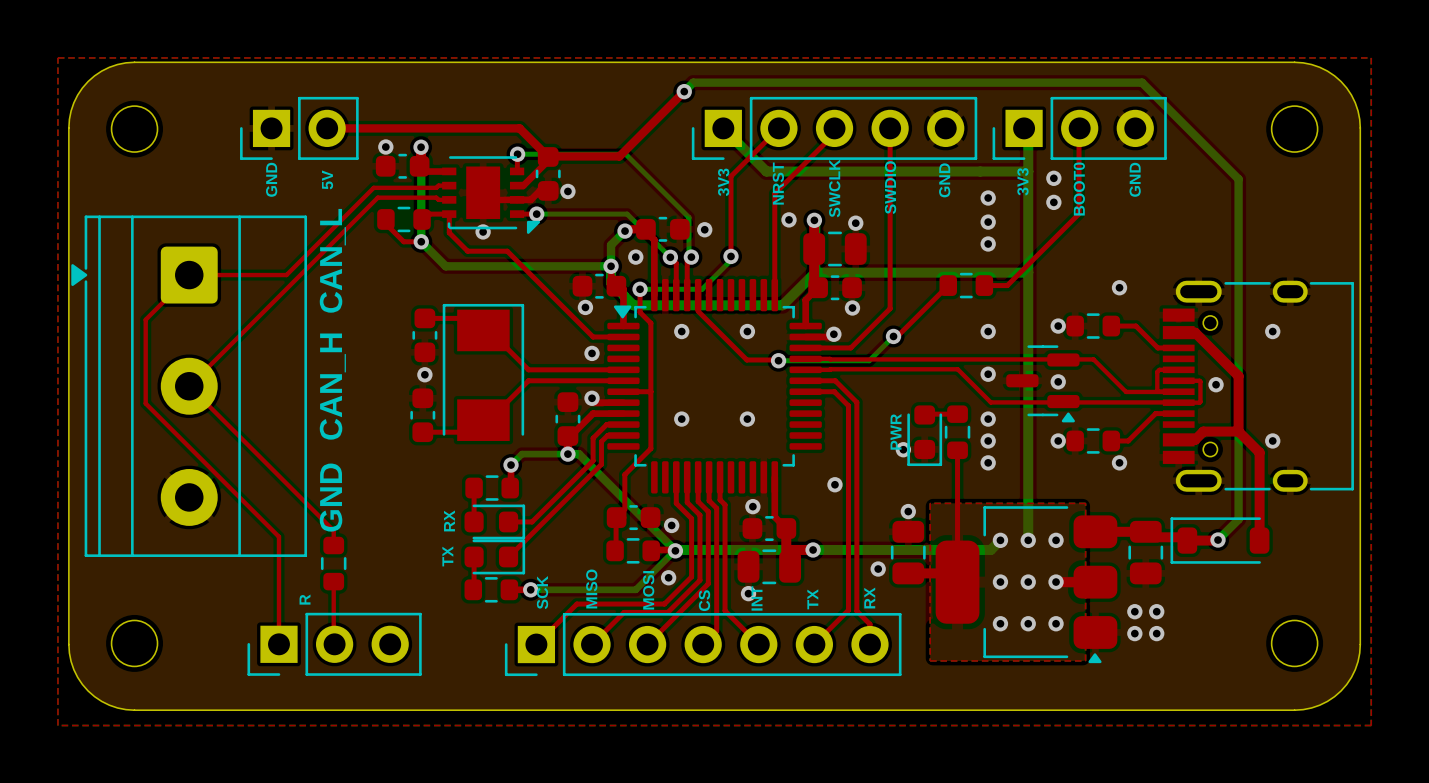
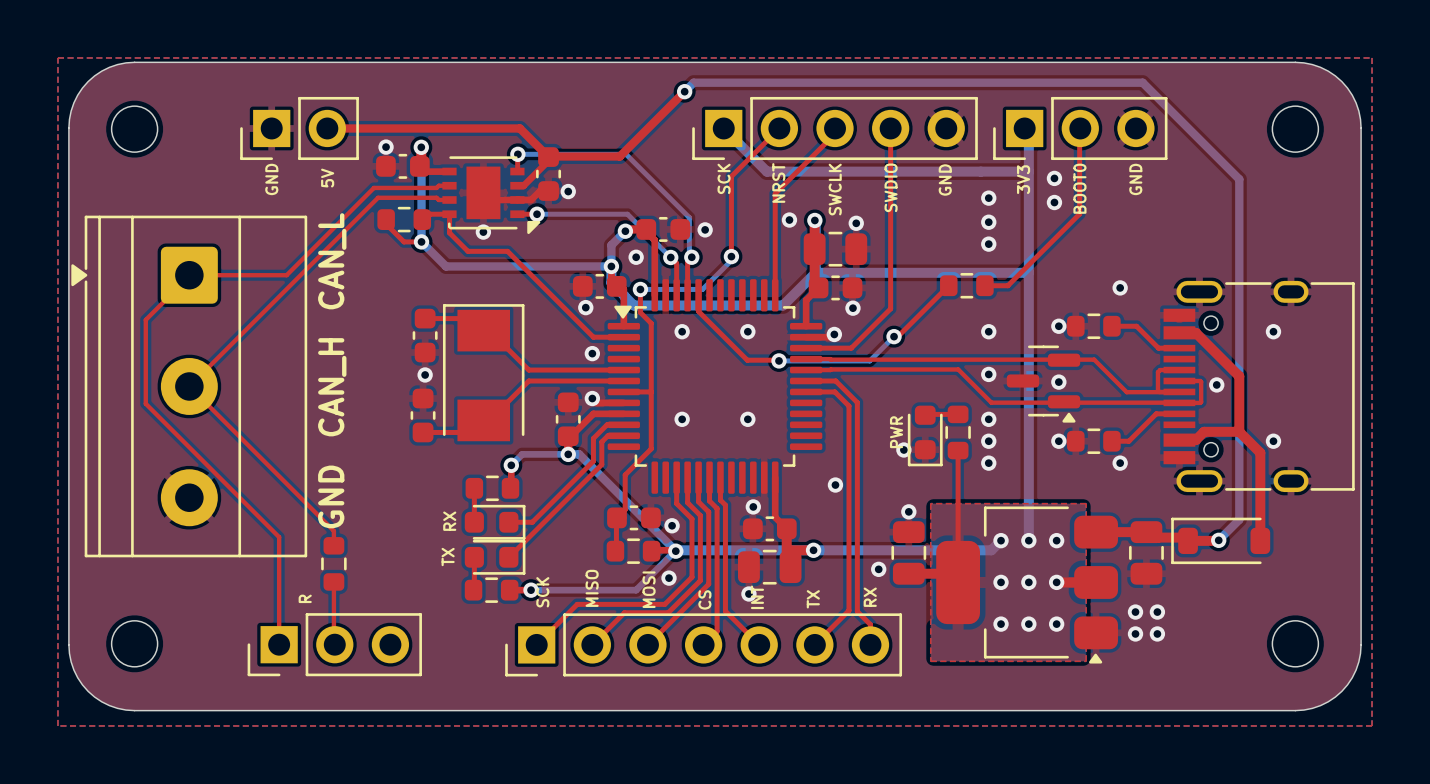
text: 3V3 (723, 182) -> SCK (724, 178)

